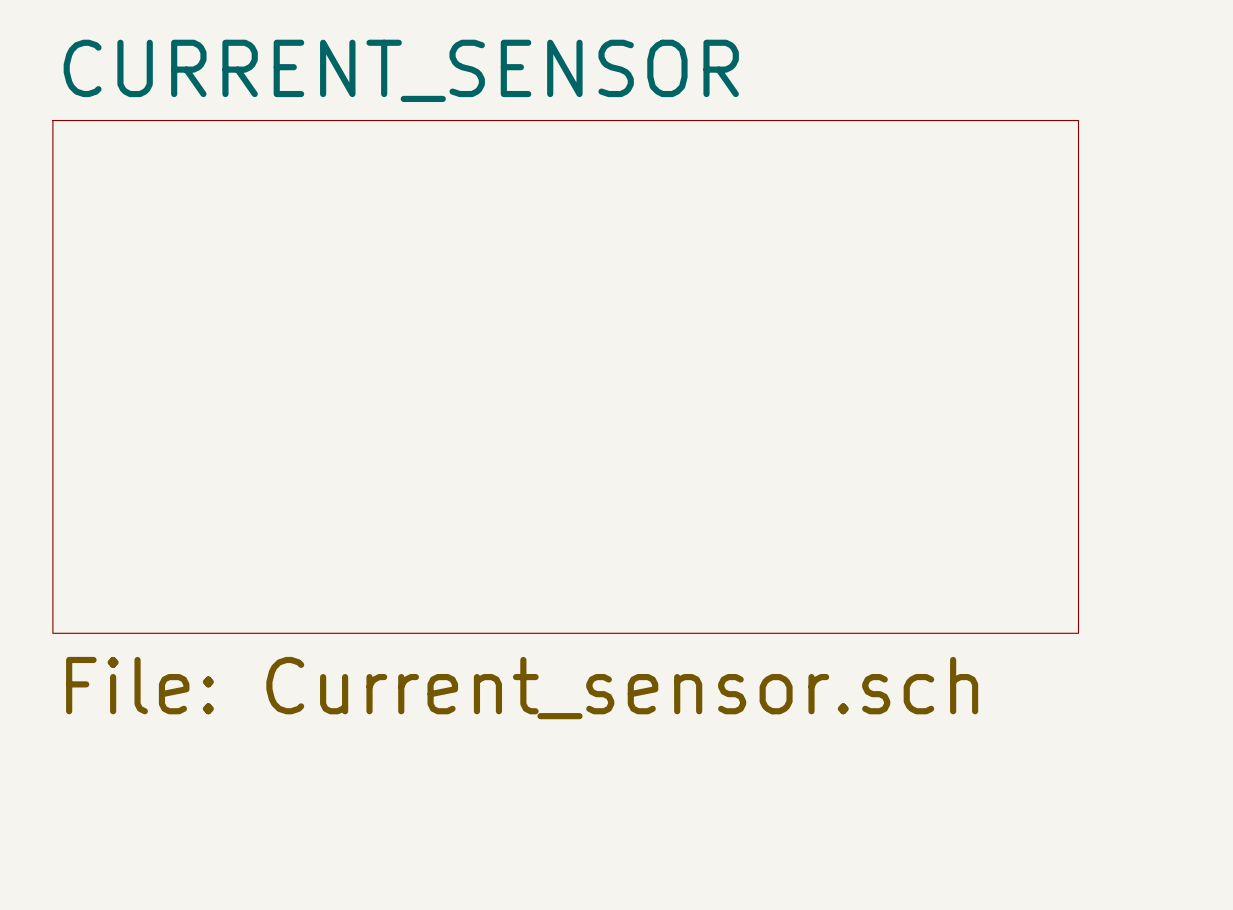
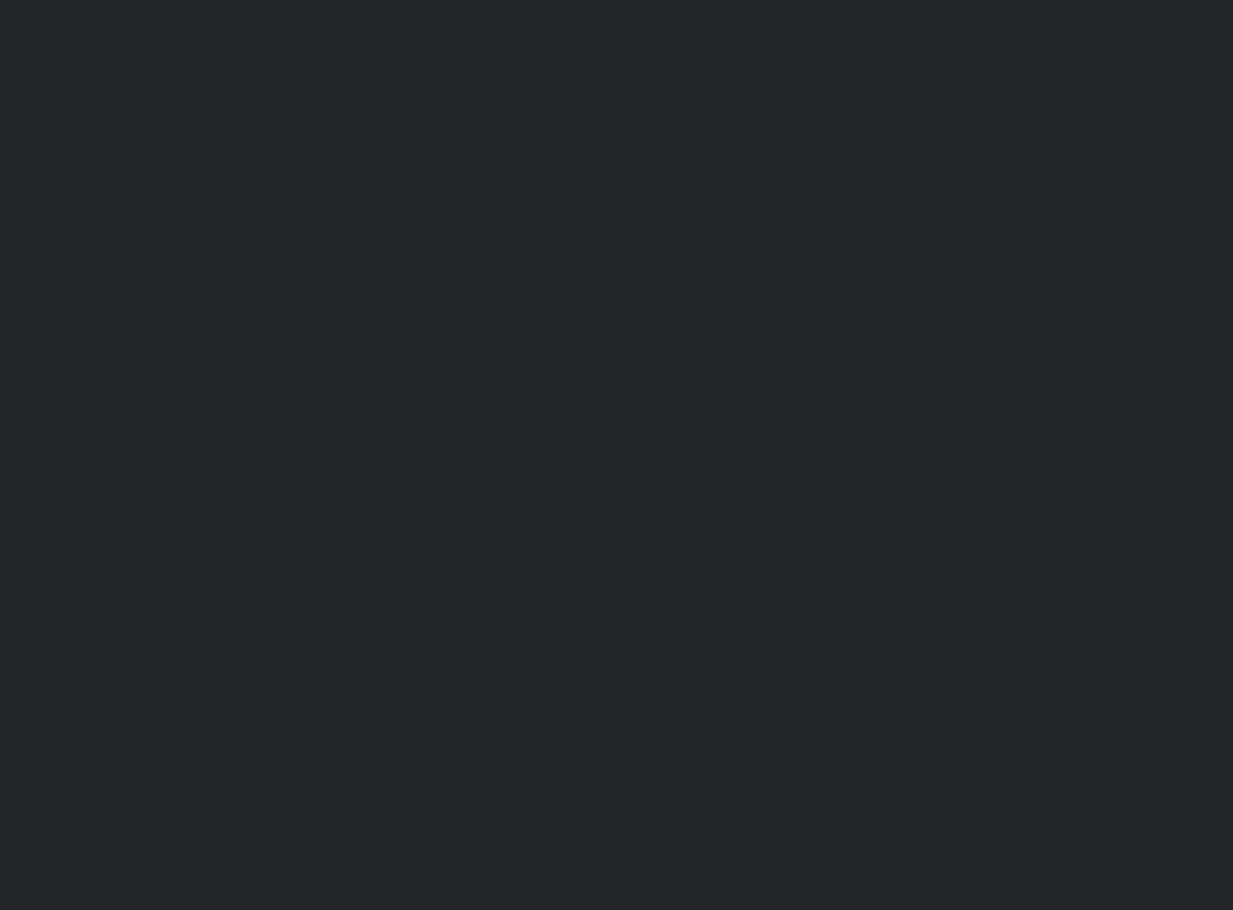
sheet CURRENT_SENSOR: File: Current_sensor.sch (565, 376) -> none

